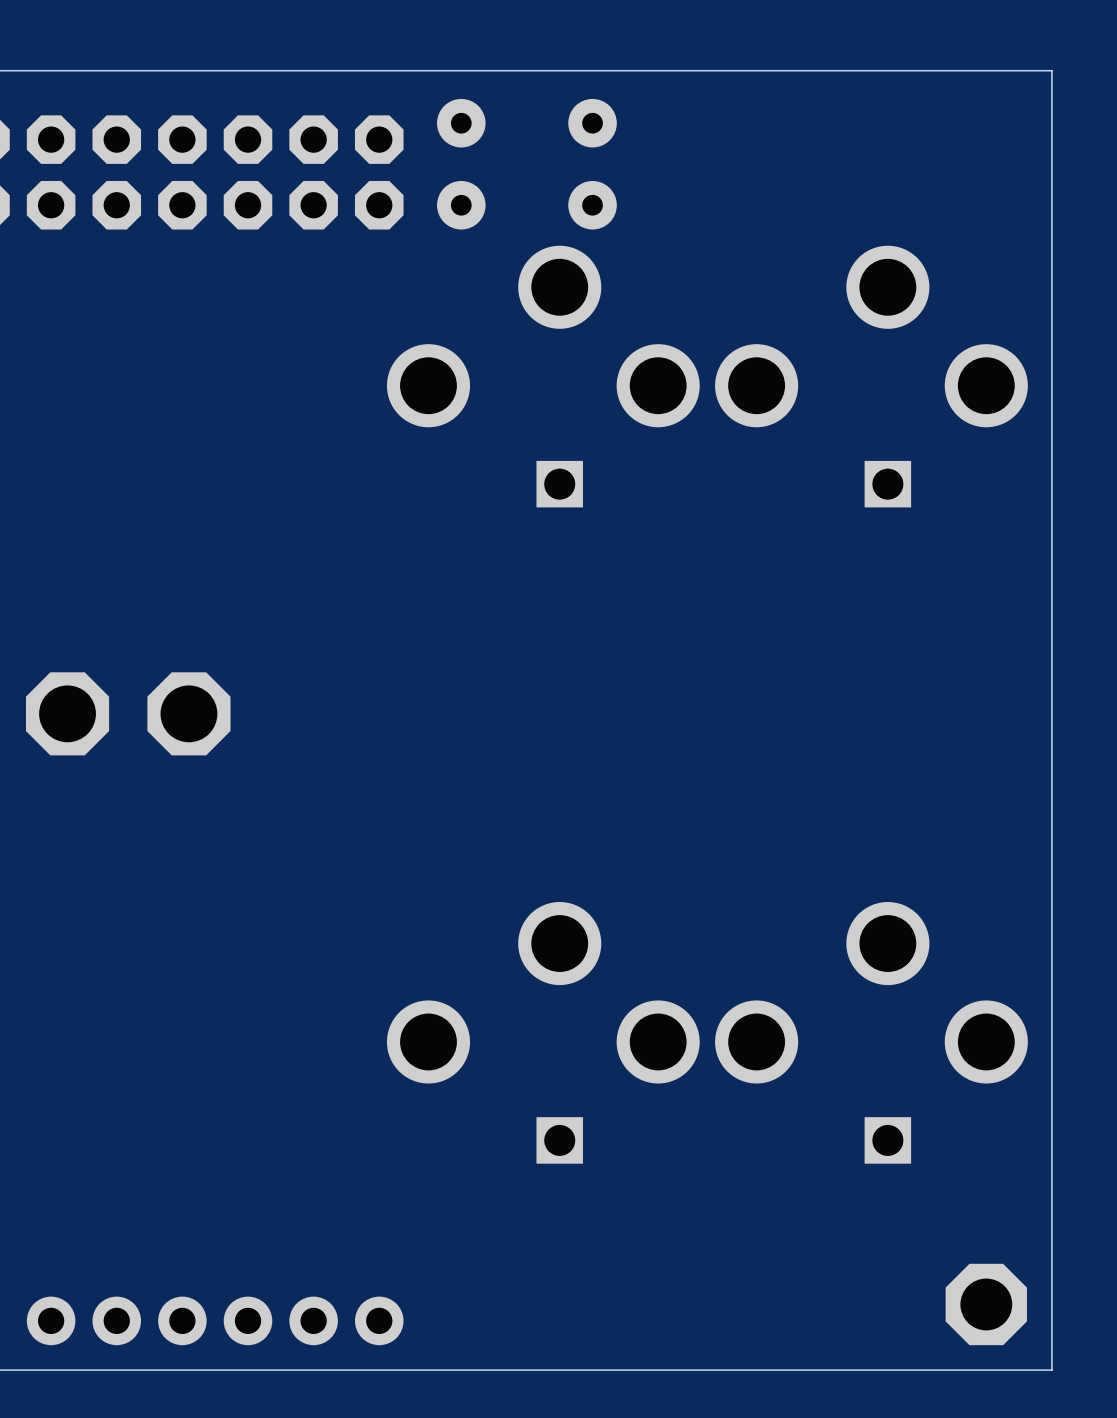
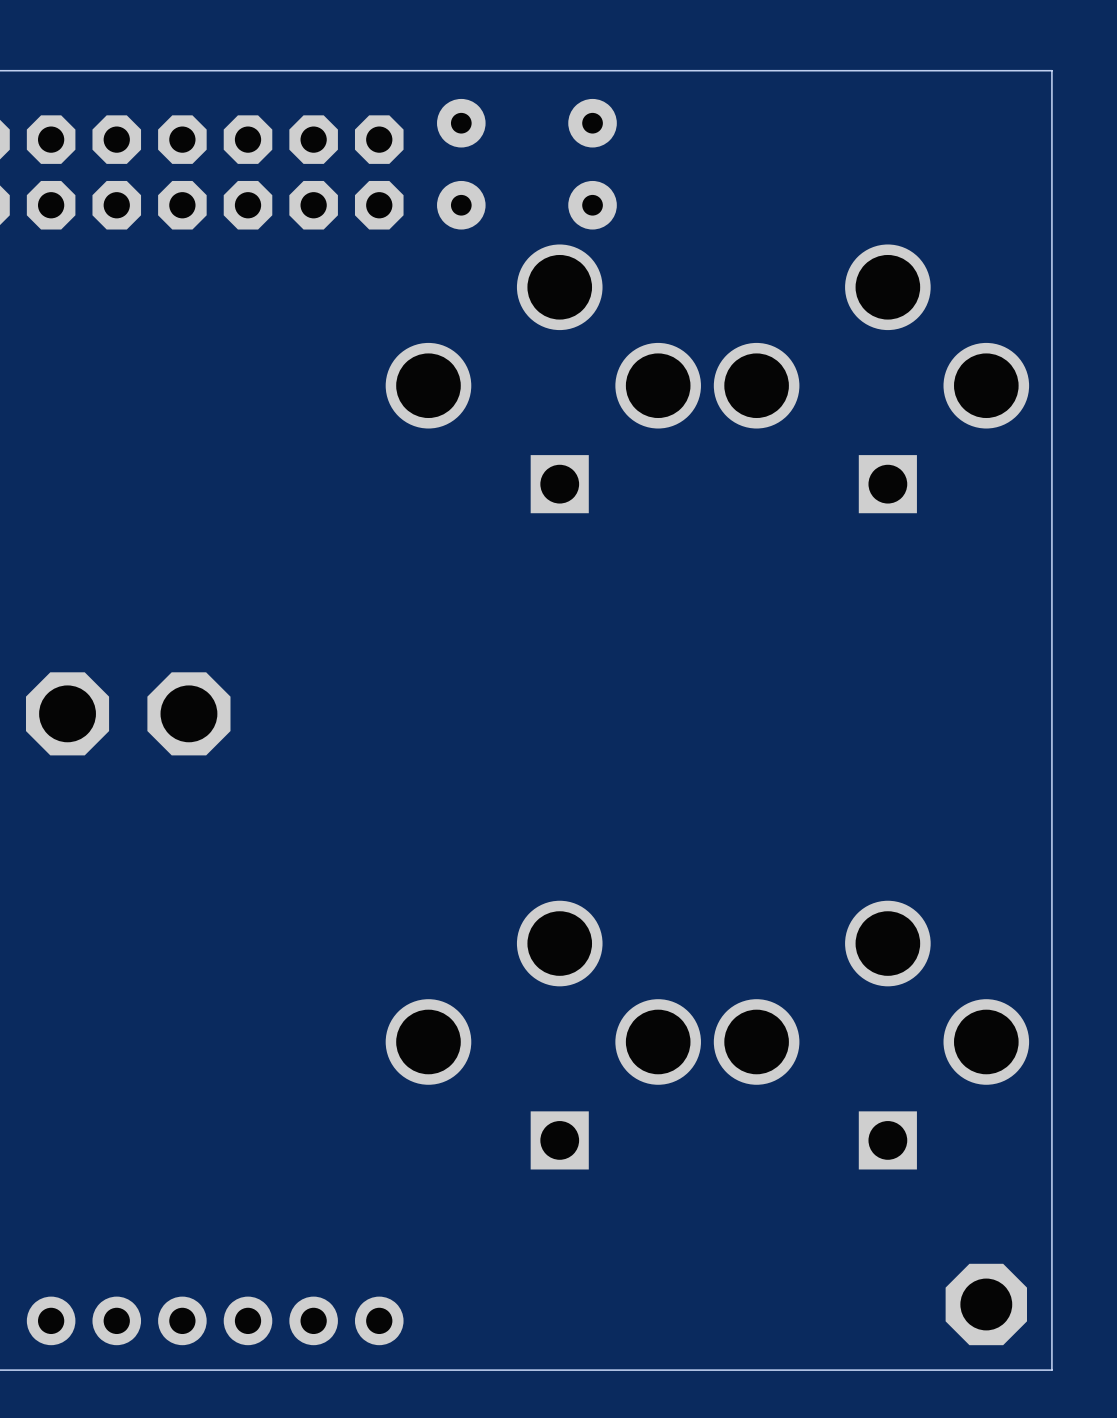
part footprint: [386, 245, 700, 508] -> [385, 244, 701, 514]
part footprint: [715, 245, 1028, 508] -> [713, 244, 1030, 514]
part footprint: [386, 901, 700, 1164] -> [385, 900, 701, 1170]
part footprint: [715, 901, 1028, 1164] -> [713, 900, 1030, 1170]

